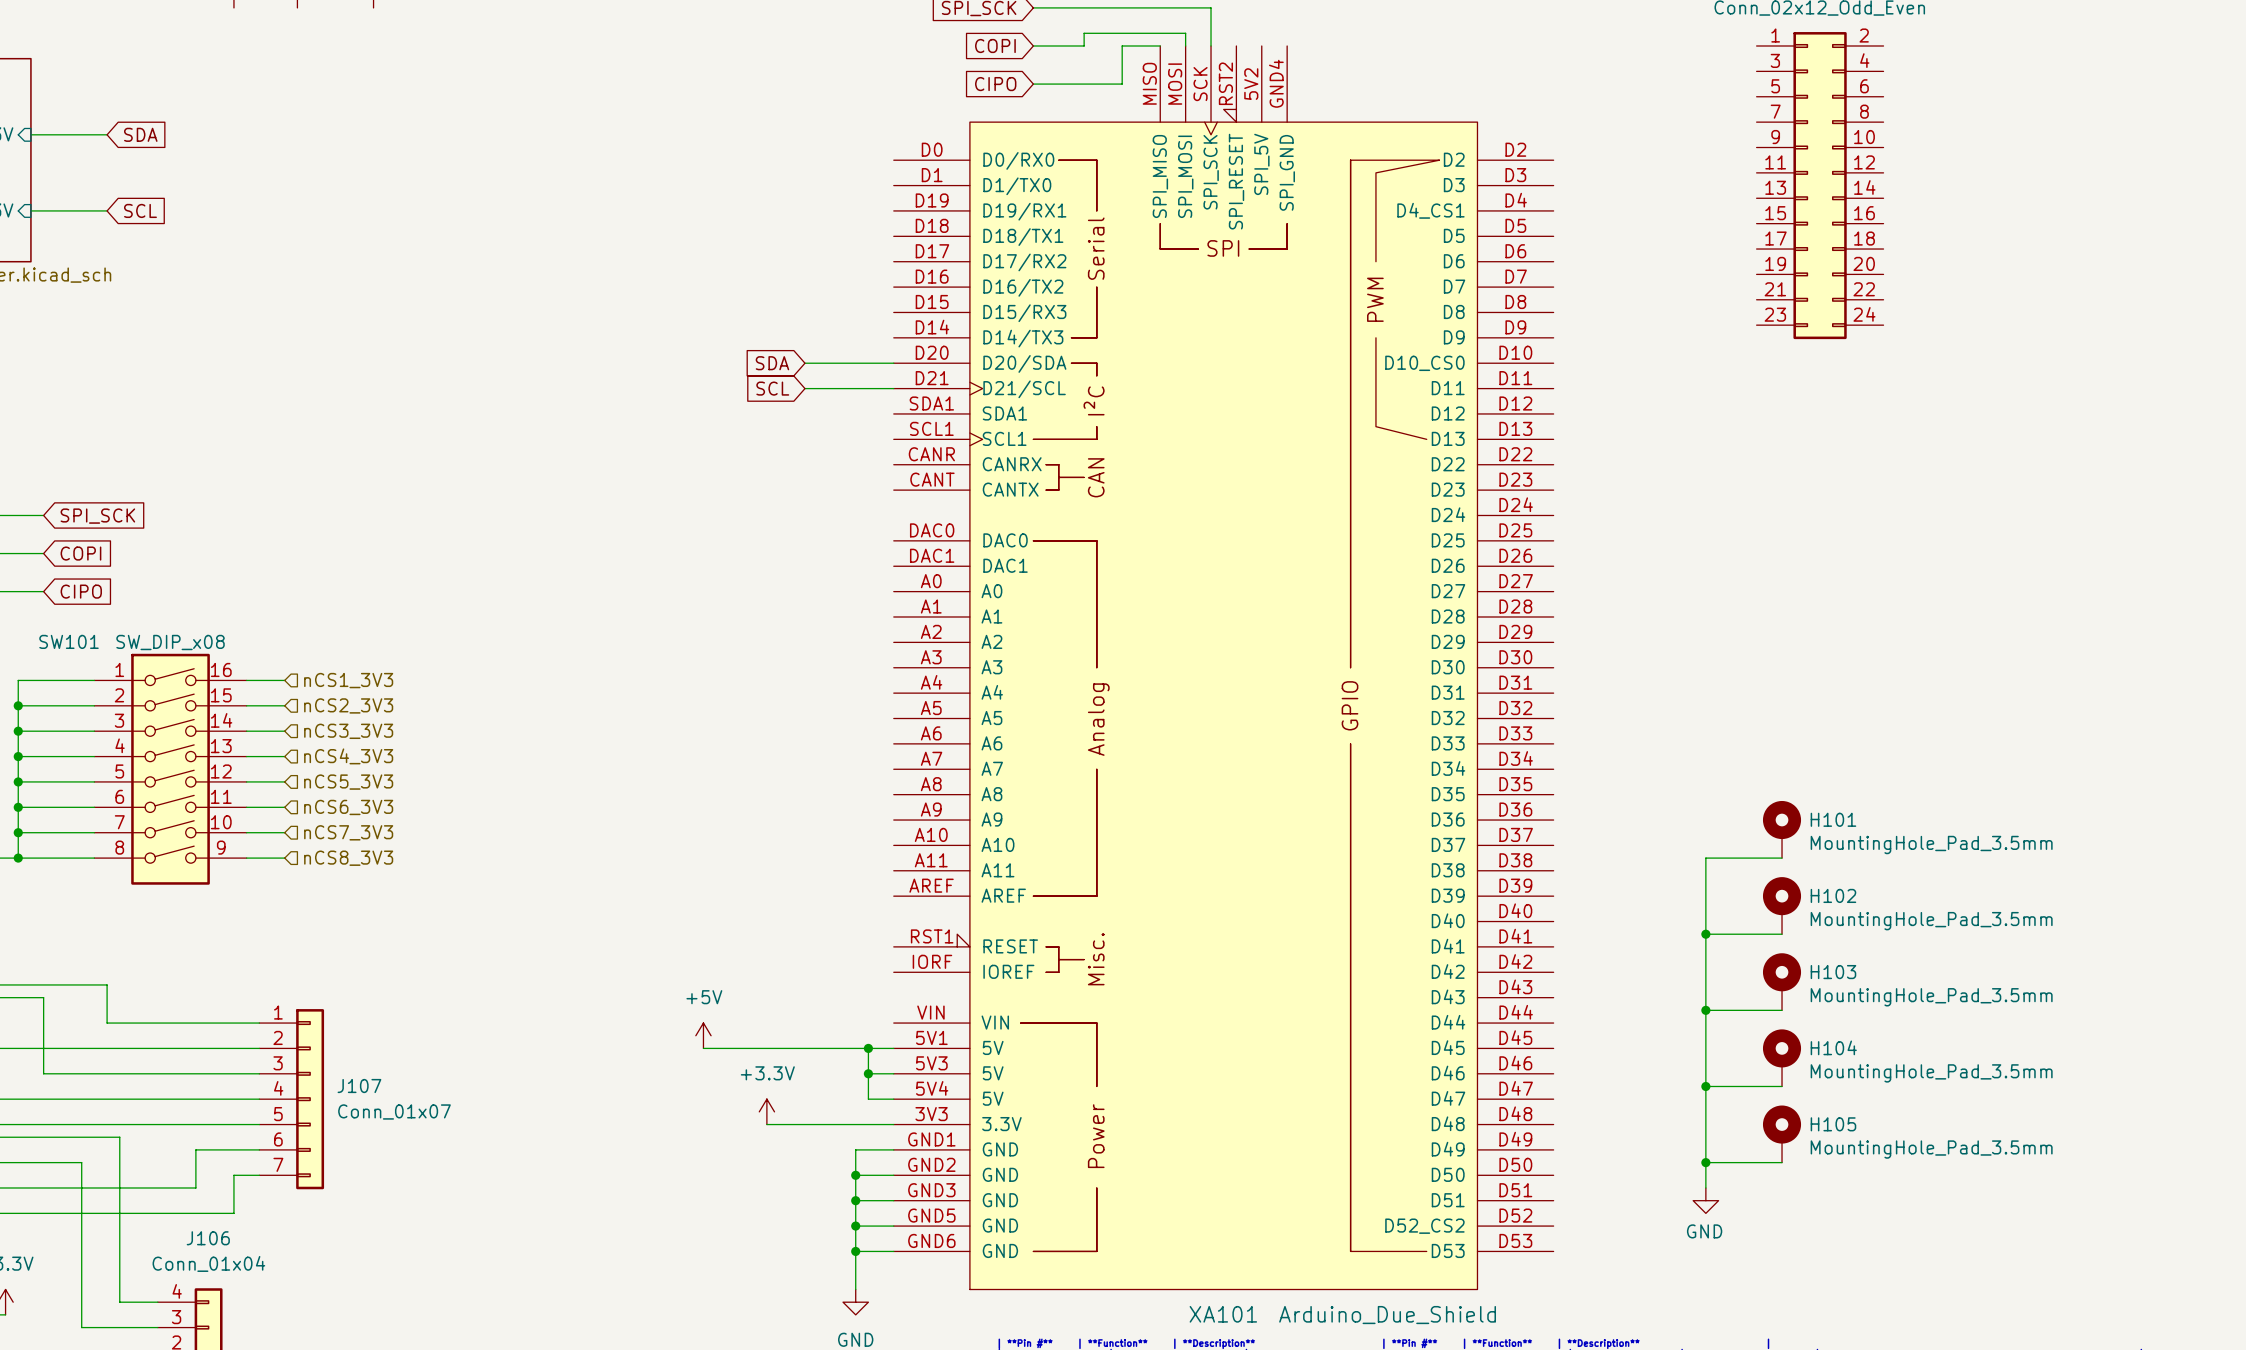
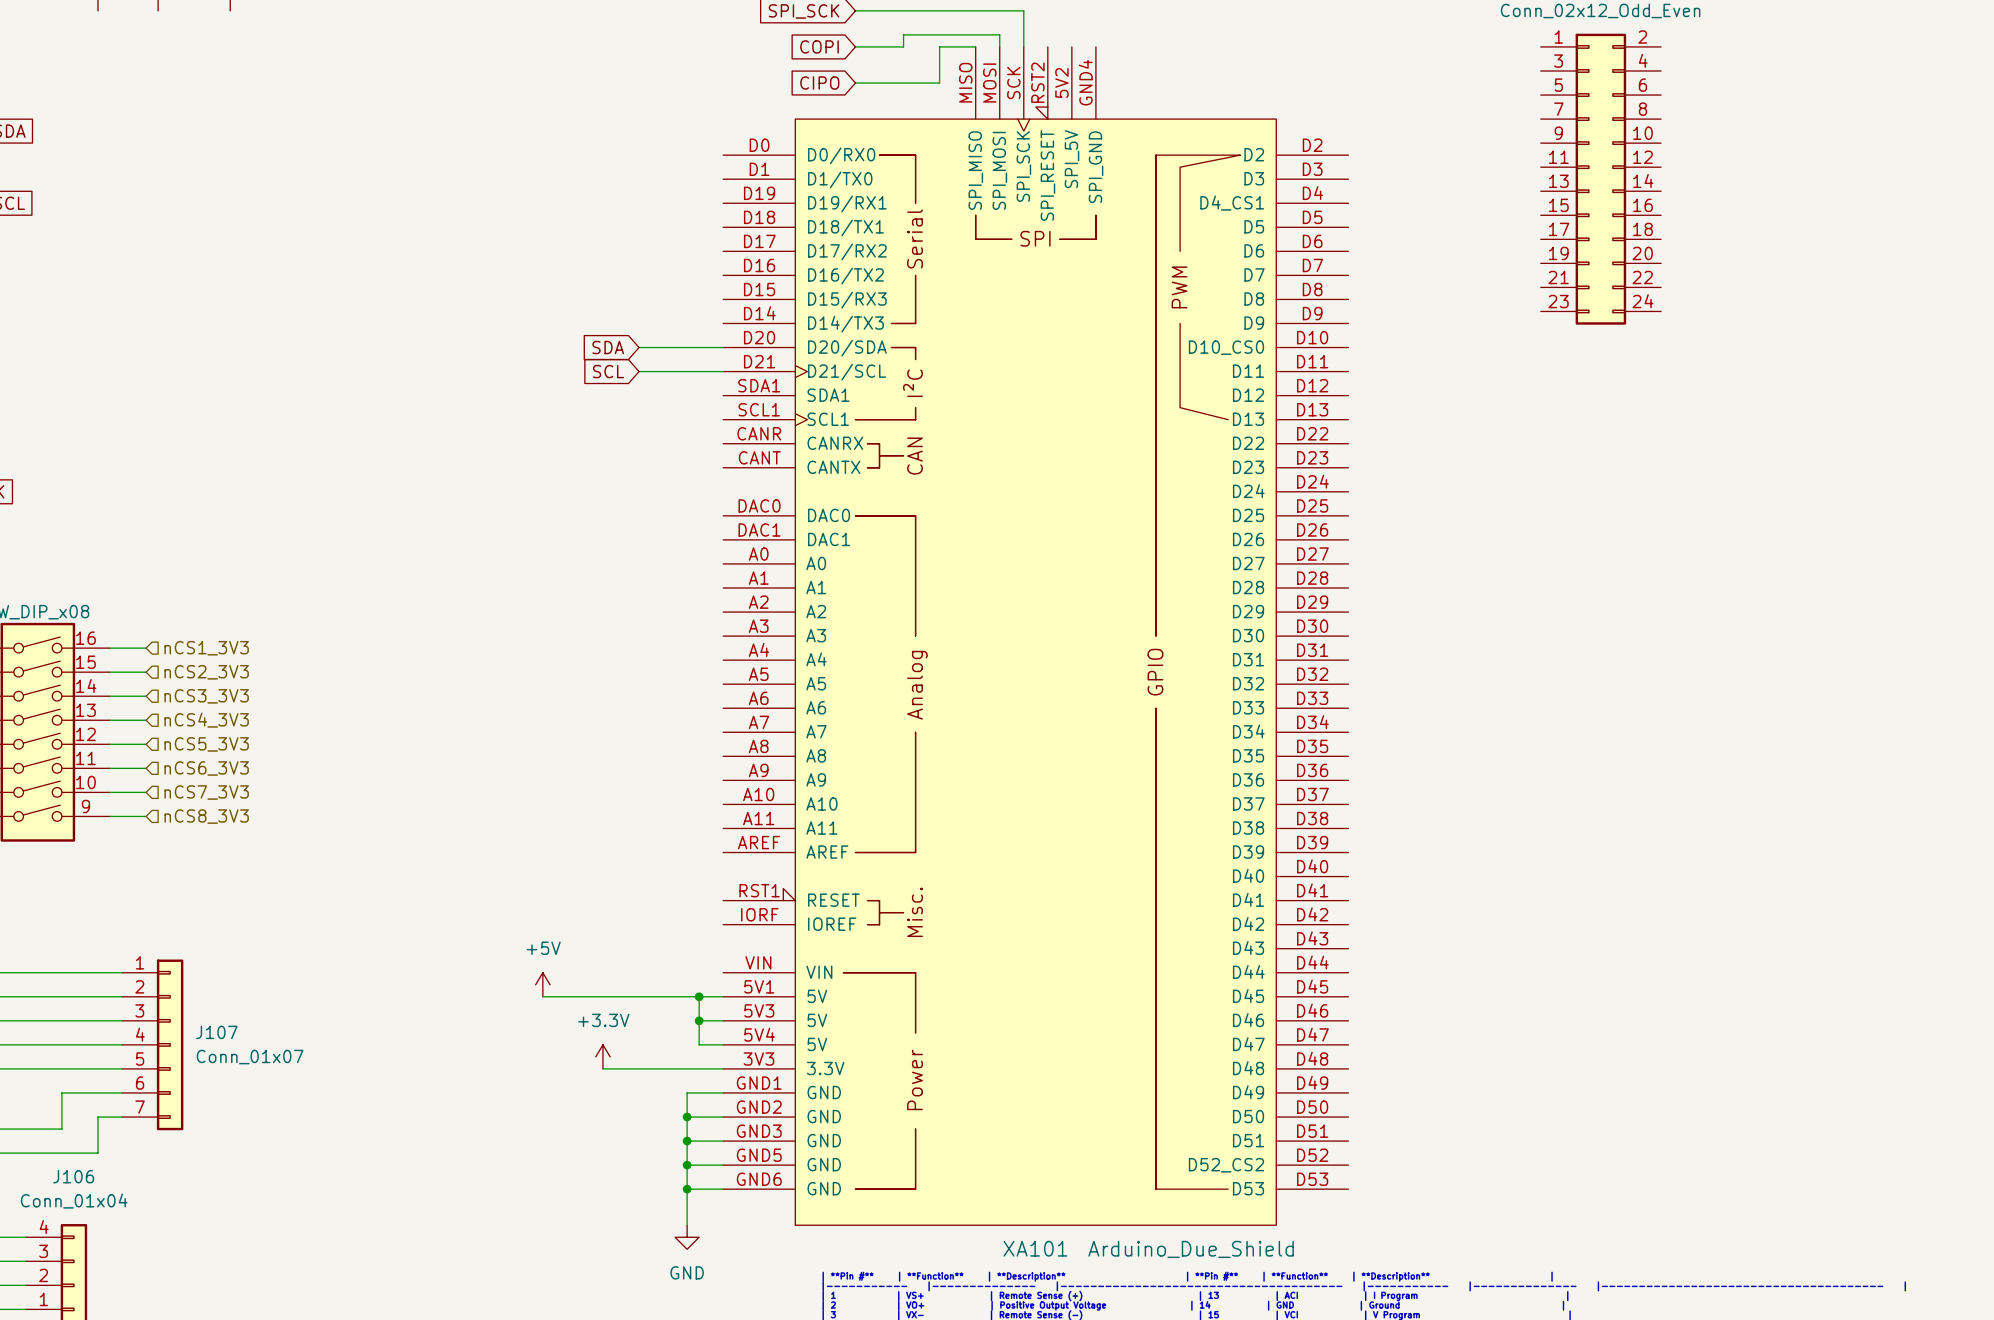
H101: MountingHole_Pad_3.5mm (1782, 829) -> none
wire: (1782, 858) (1705, 858) (1705, 1187) -> none
H102: MountingHole_Pad_3.5mm (1782, 905) -> none
wire: (1705, 934) (1782, 934) -> none
junction: (1705, 934) -> none
H103: MountingHole_Pad_3.5mm (1782, 981) -> none
wire: (1705, 1010) (1782, 1010) -> none
junction: (1705, 1010) -> none
H104: MountingHole_Pad_3.5mm (1782, 1057) -> none
wire: (1705, 1086) (1782, 1086) -> none
junction: (1705, 1086) -> none
H105: MountingHole_Pad_3.5mm (1782, 1134) -> none
wire: (1705, 1162) (1782, 1162) -> none
junction: (1705, 1162) -> none
power symbol: GND (1705, 1200) -> none

